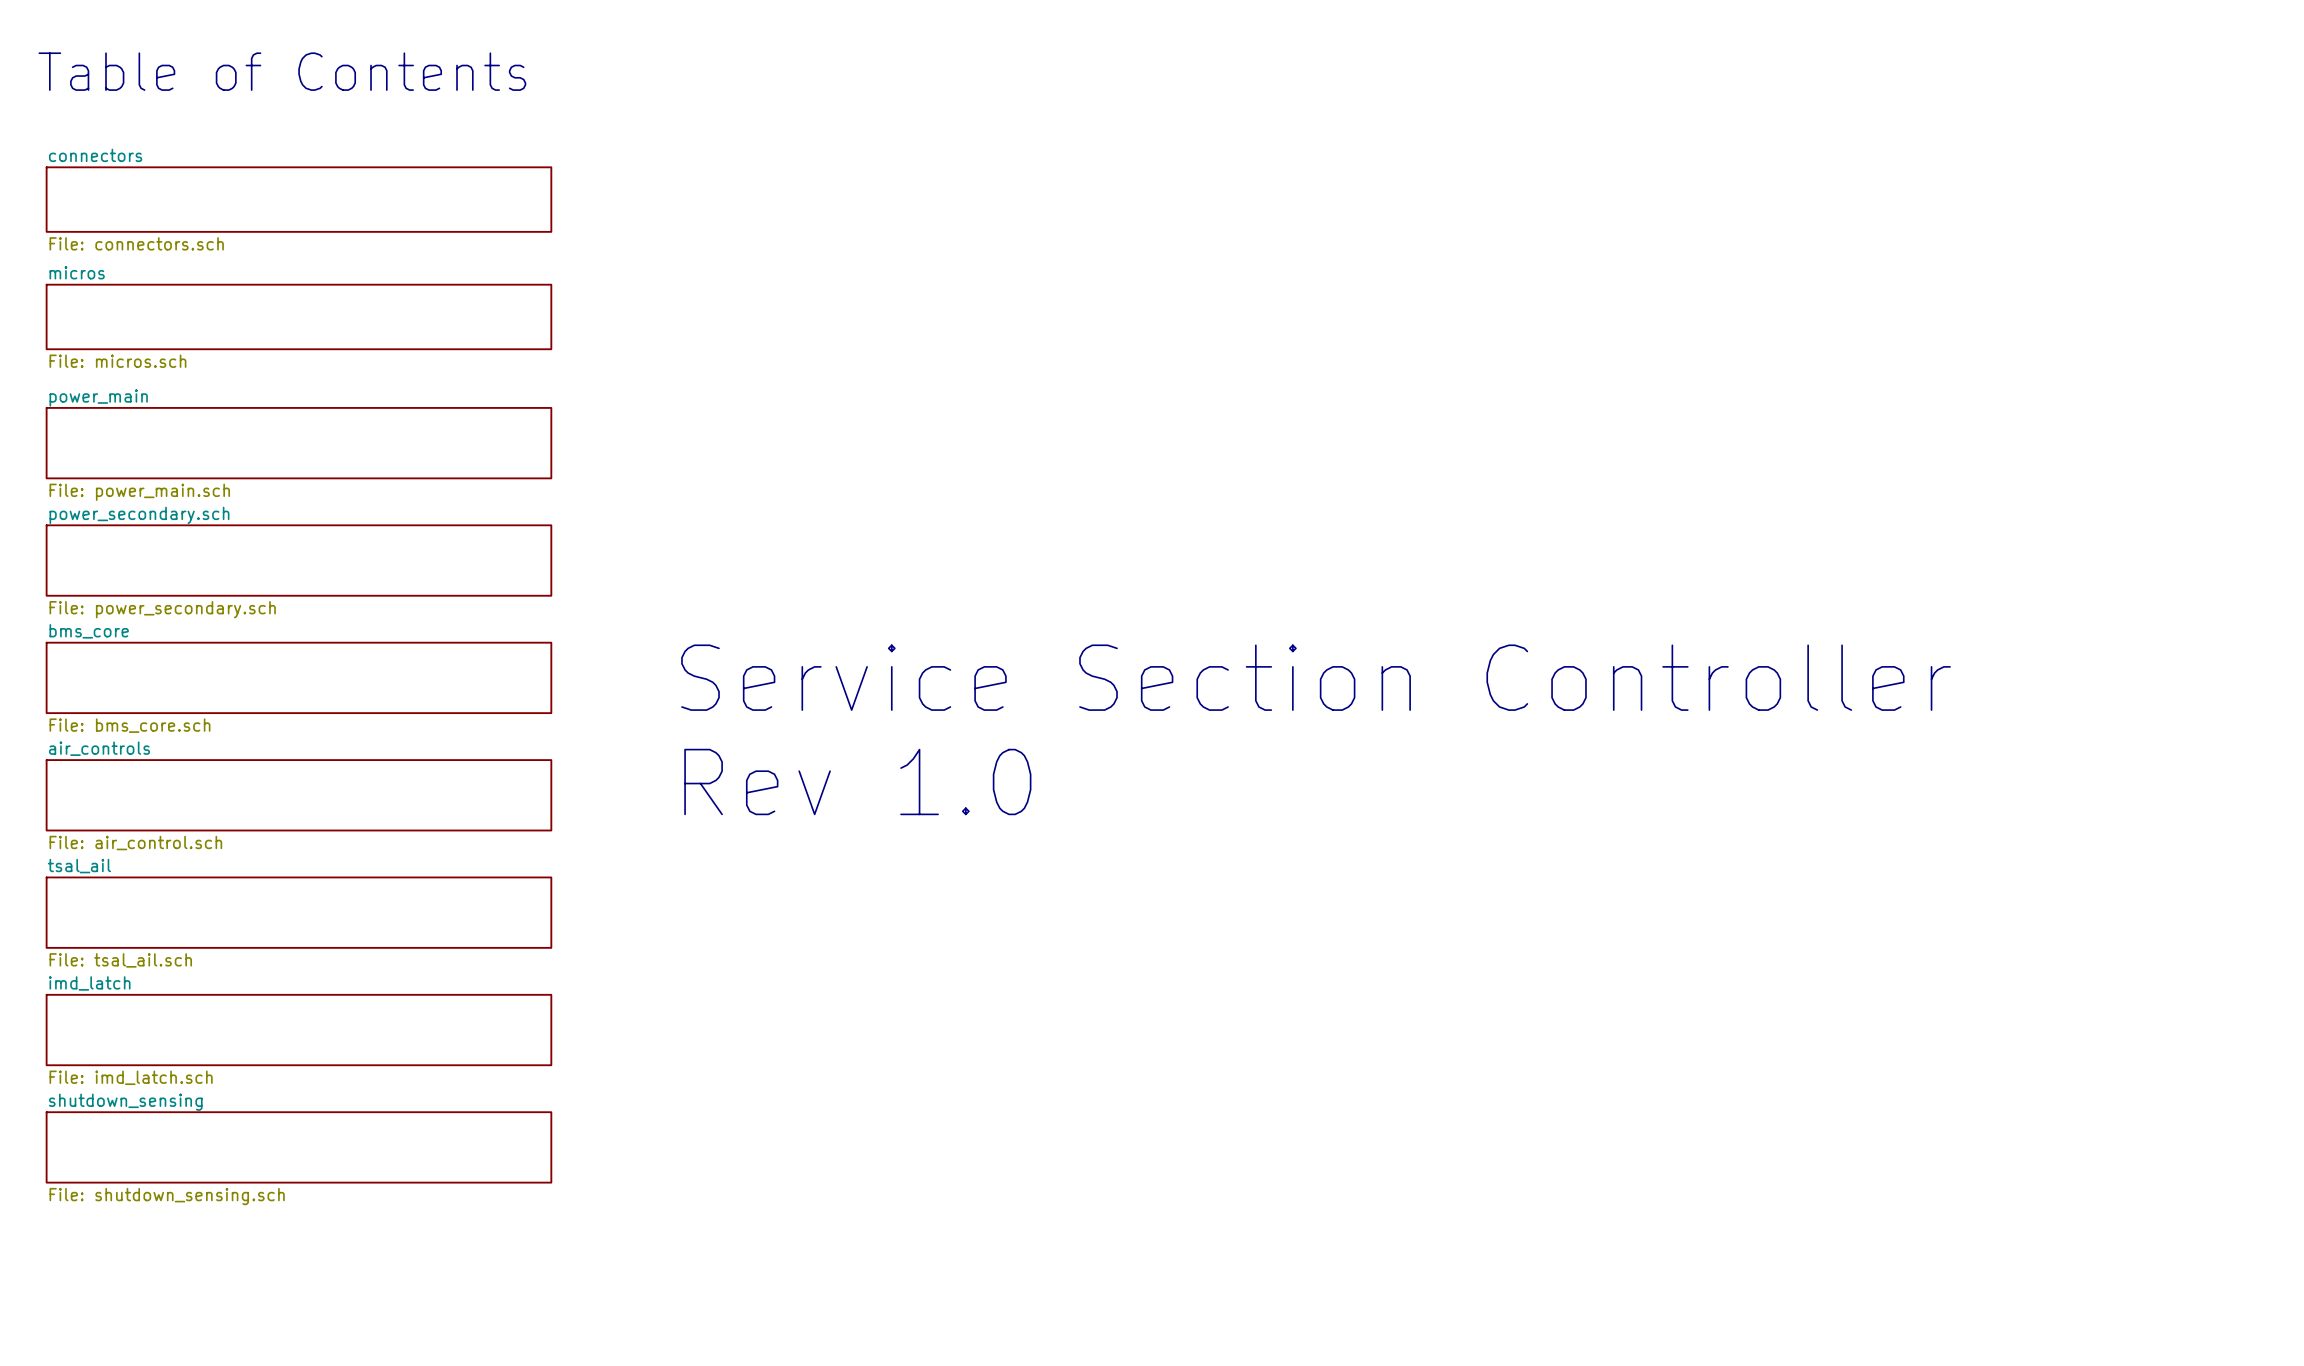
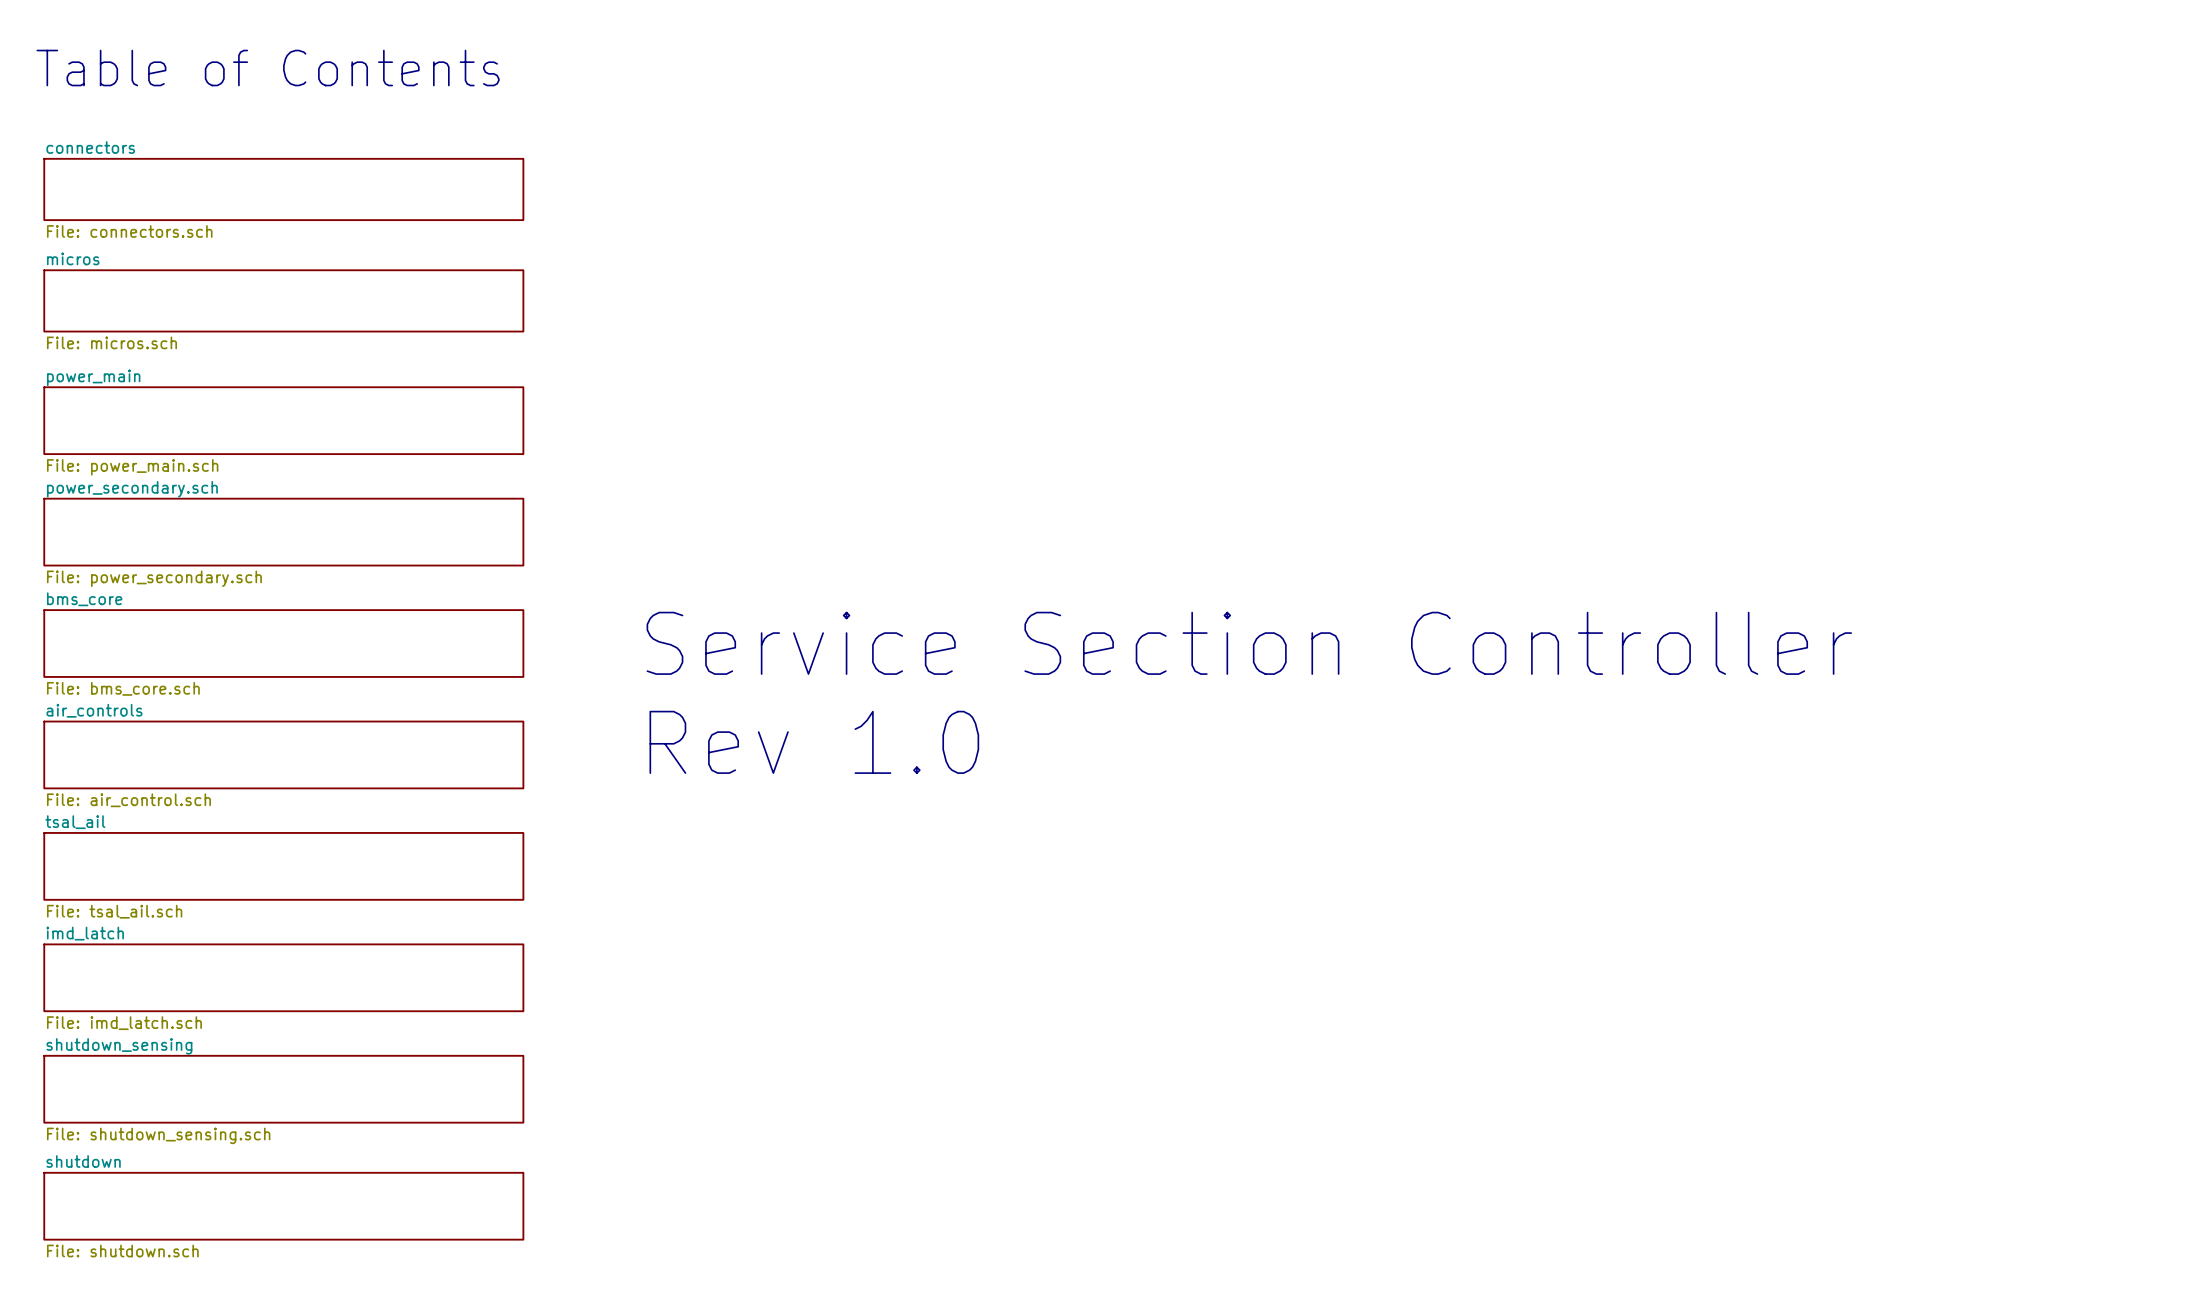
sheet shutdown: none -> File: shutdown.sch (283, 1206)

